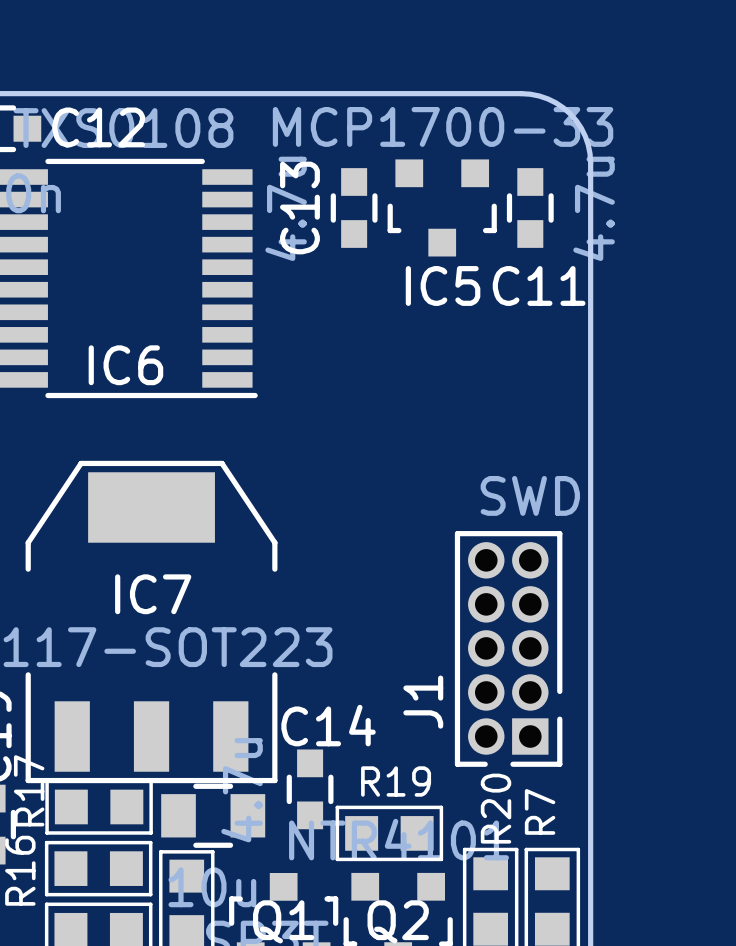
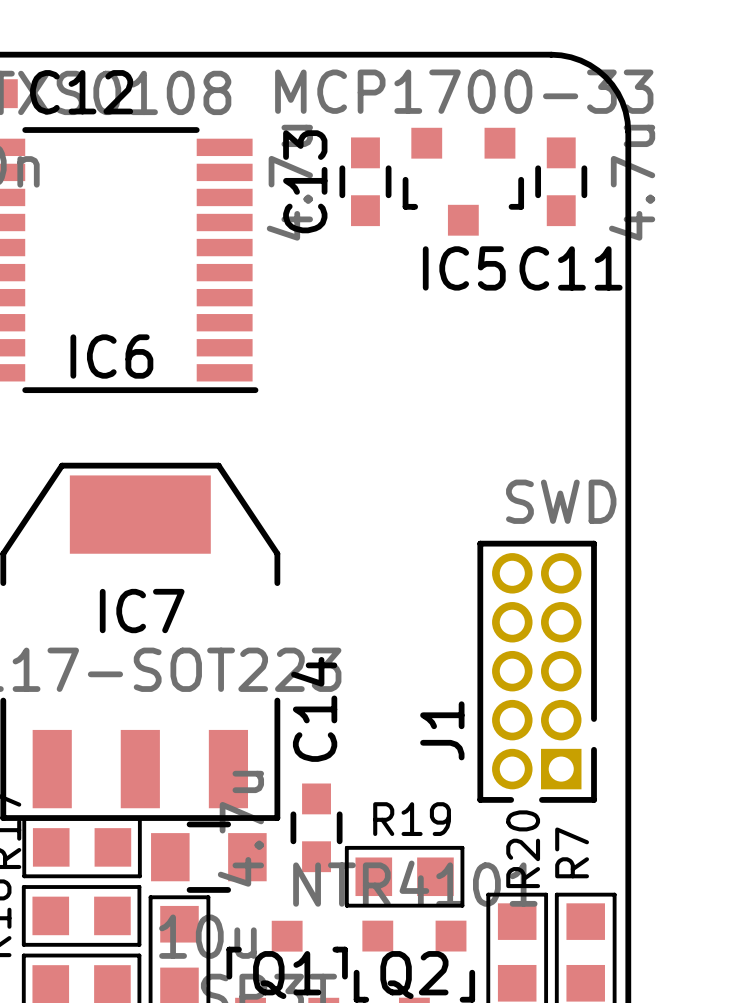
C14 name rotation: 0° (328, 725) -> 90° counterclockwise (314, 709)

